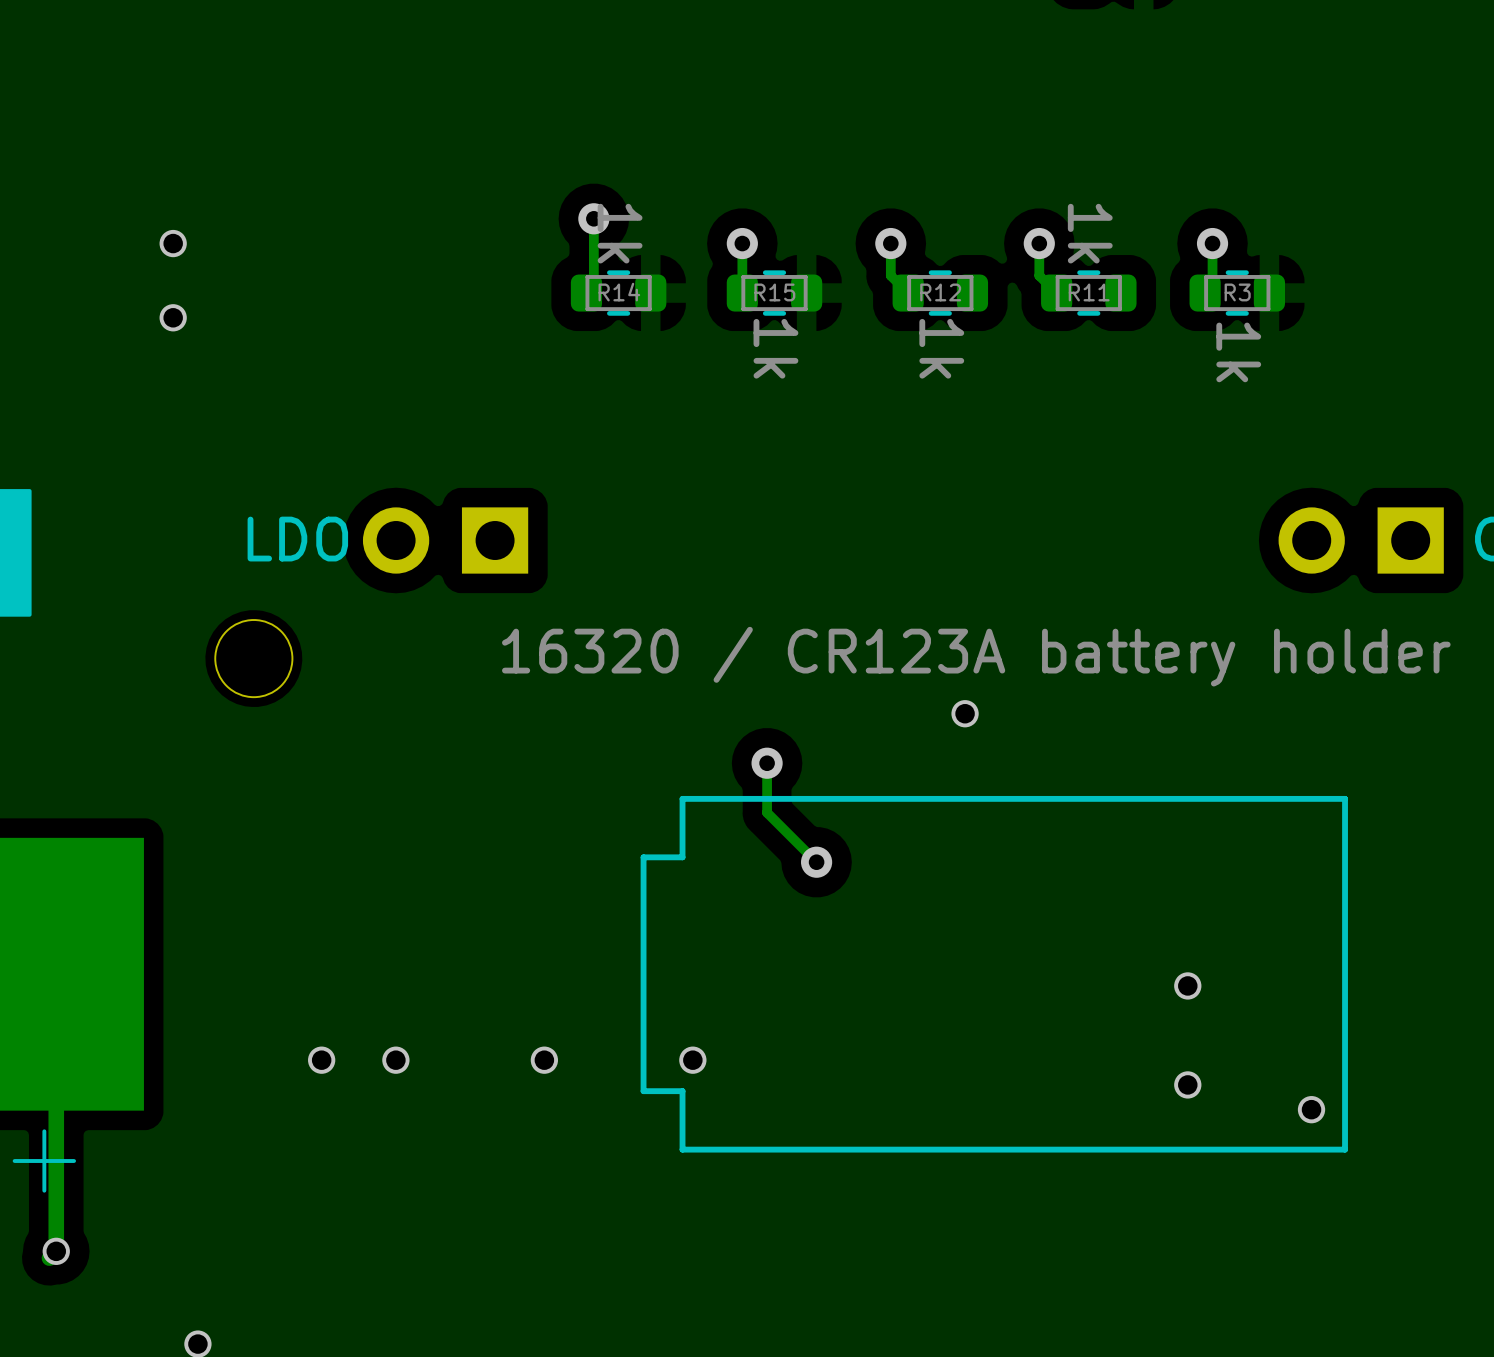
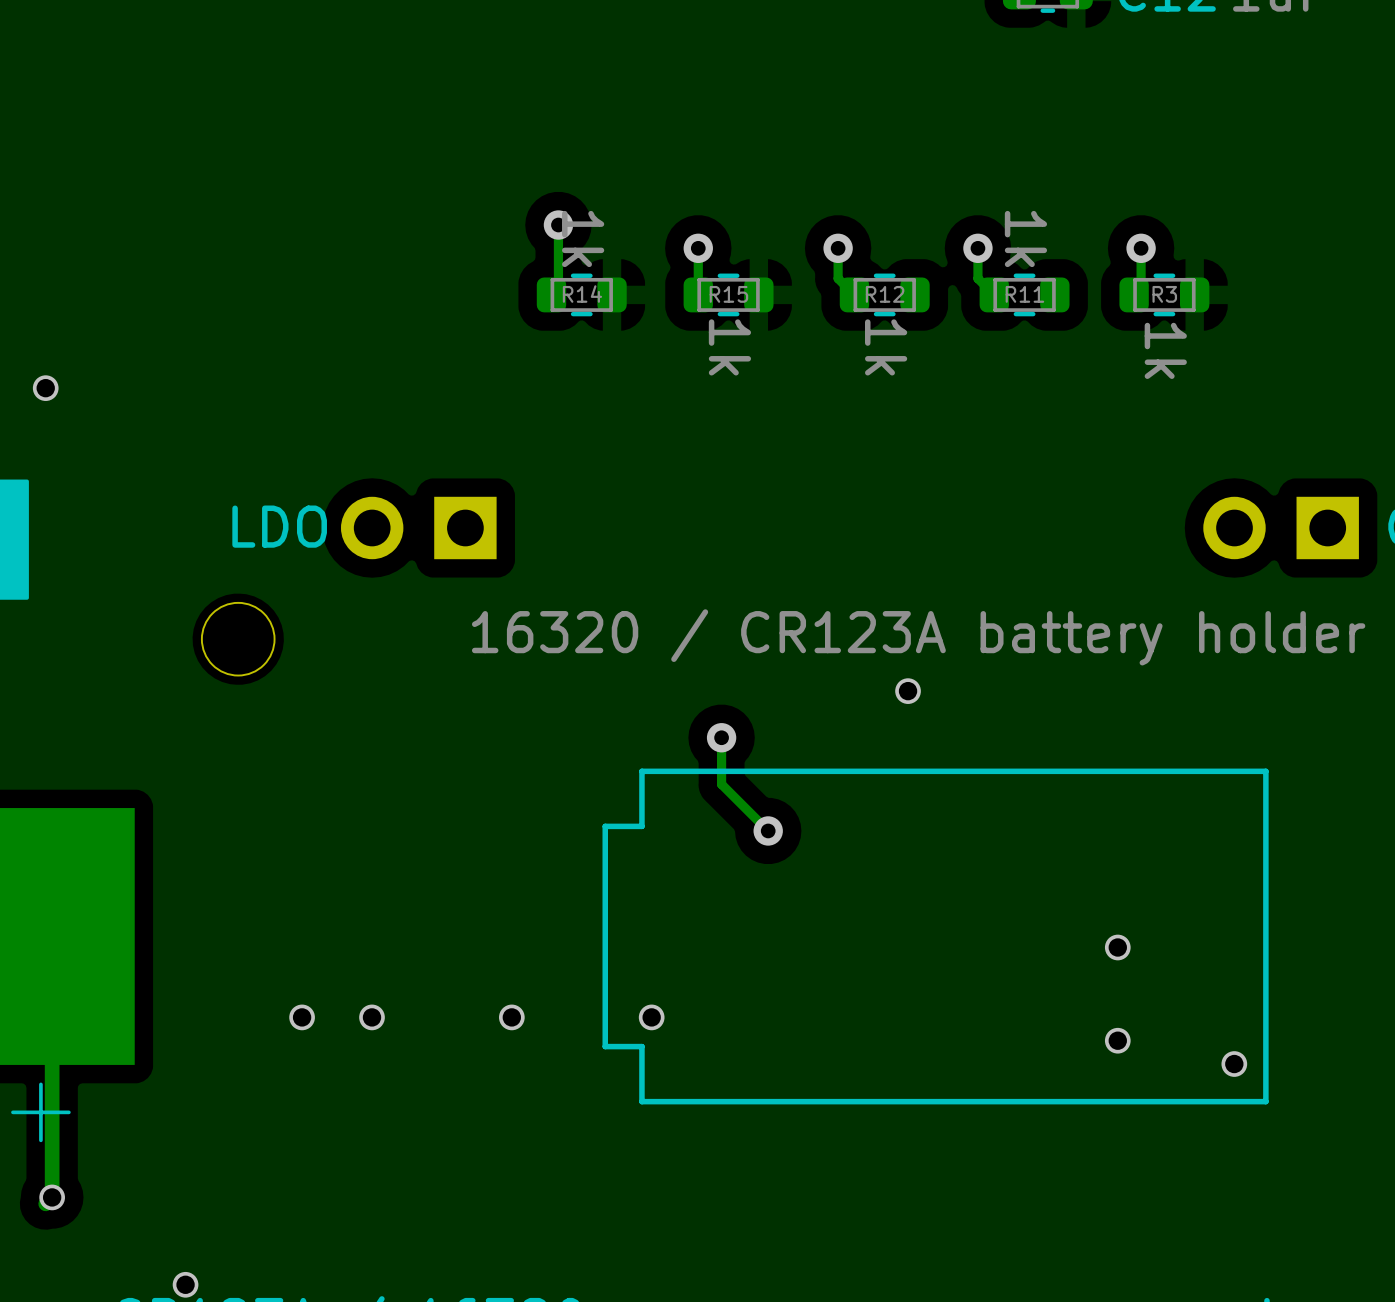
via: (173, 243) -> none
via: (173, 317) -> none
via: none -> (45, 388)

